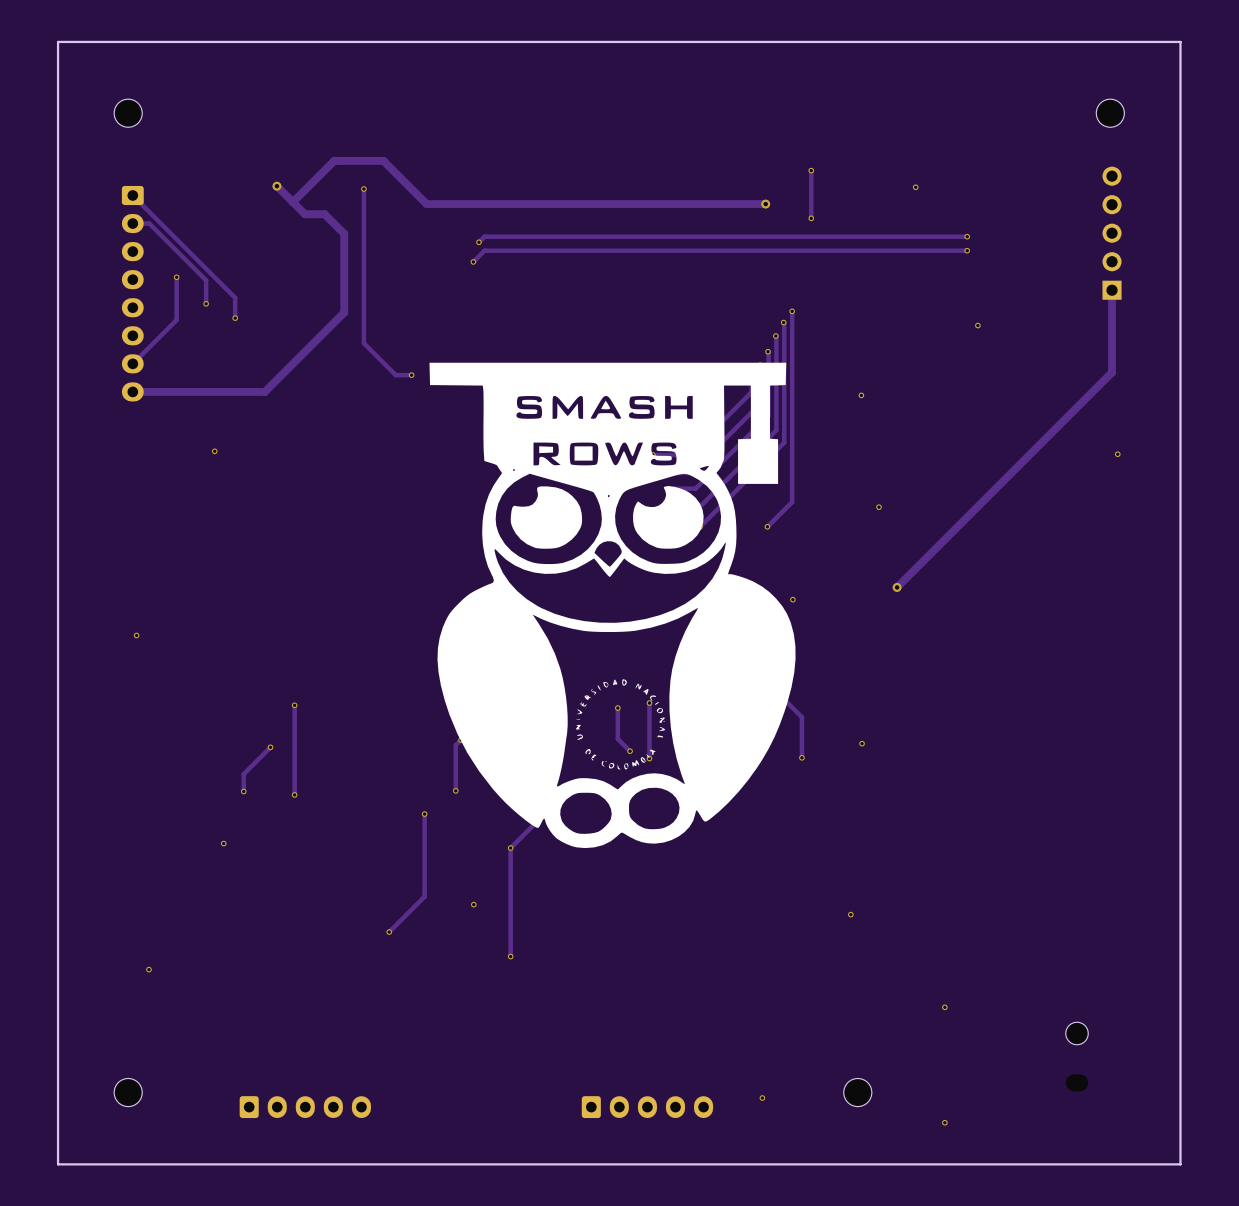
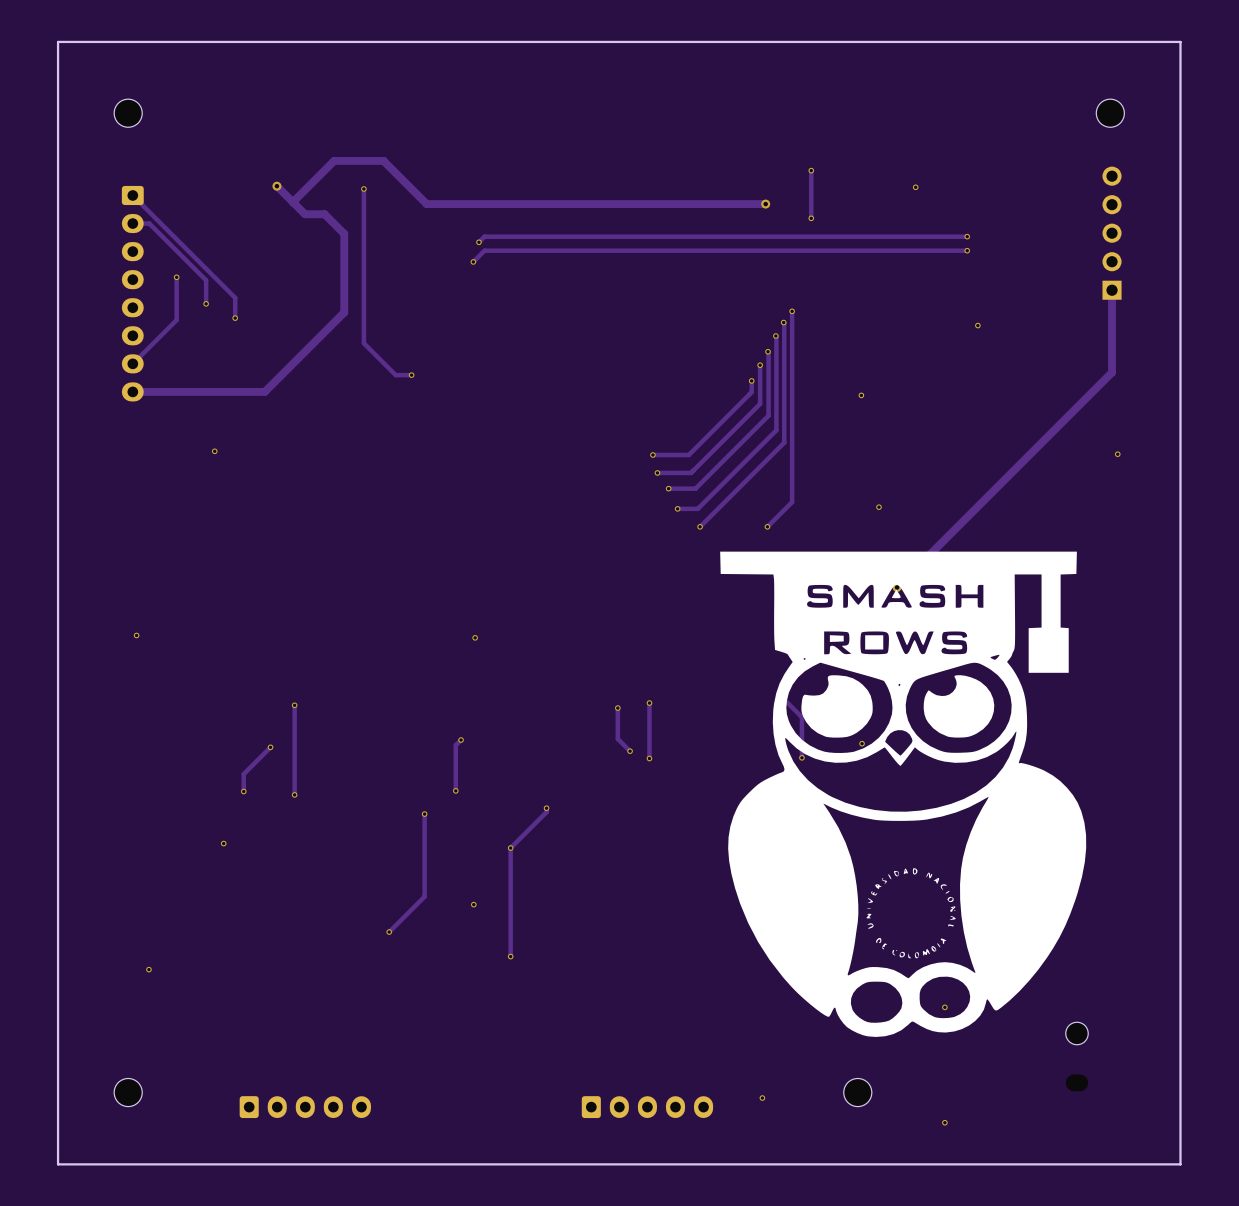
drawing: none -> [720, 551, 1087, 1037]
part: (612, 605) -> none

